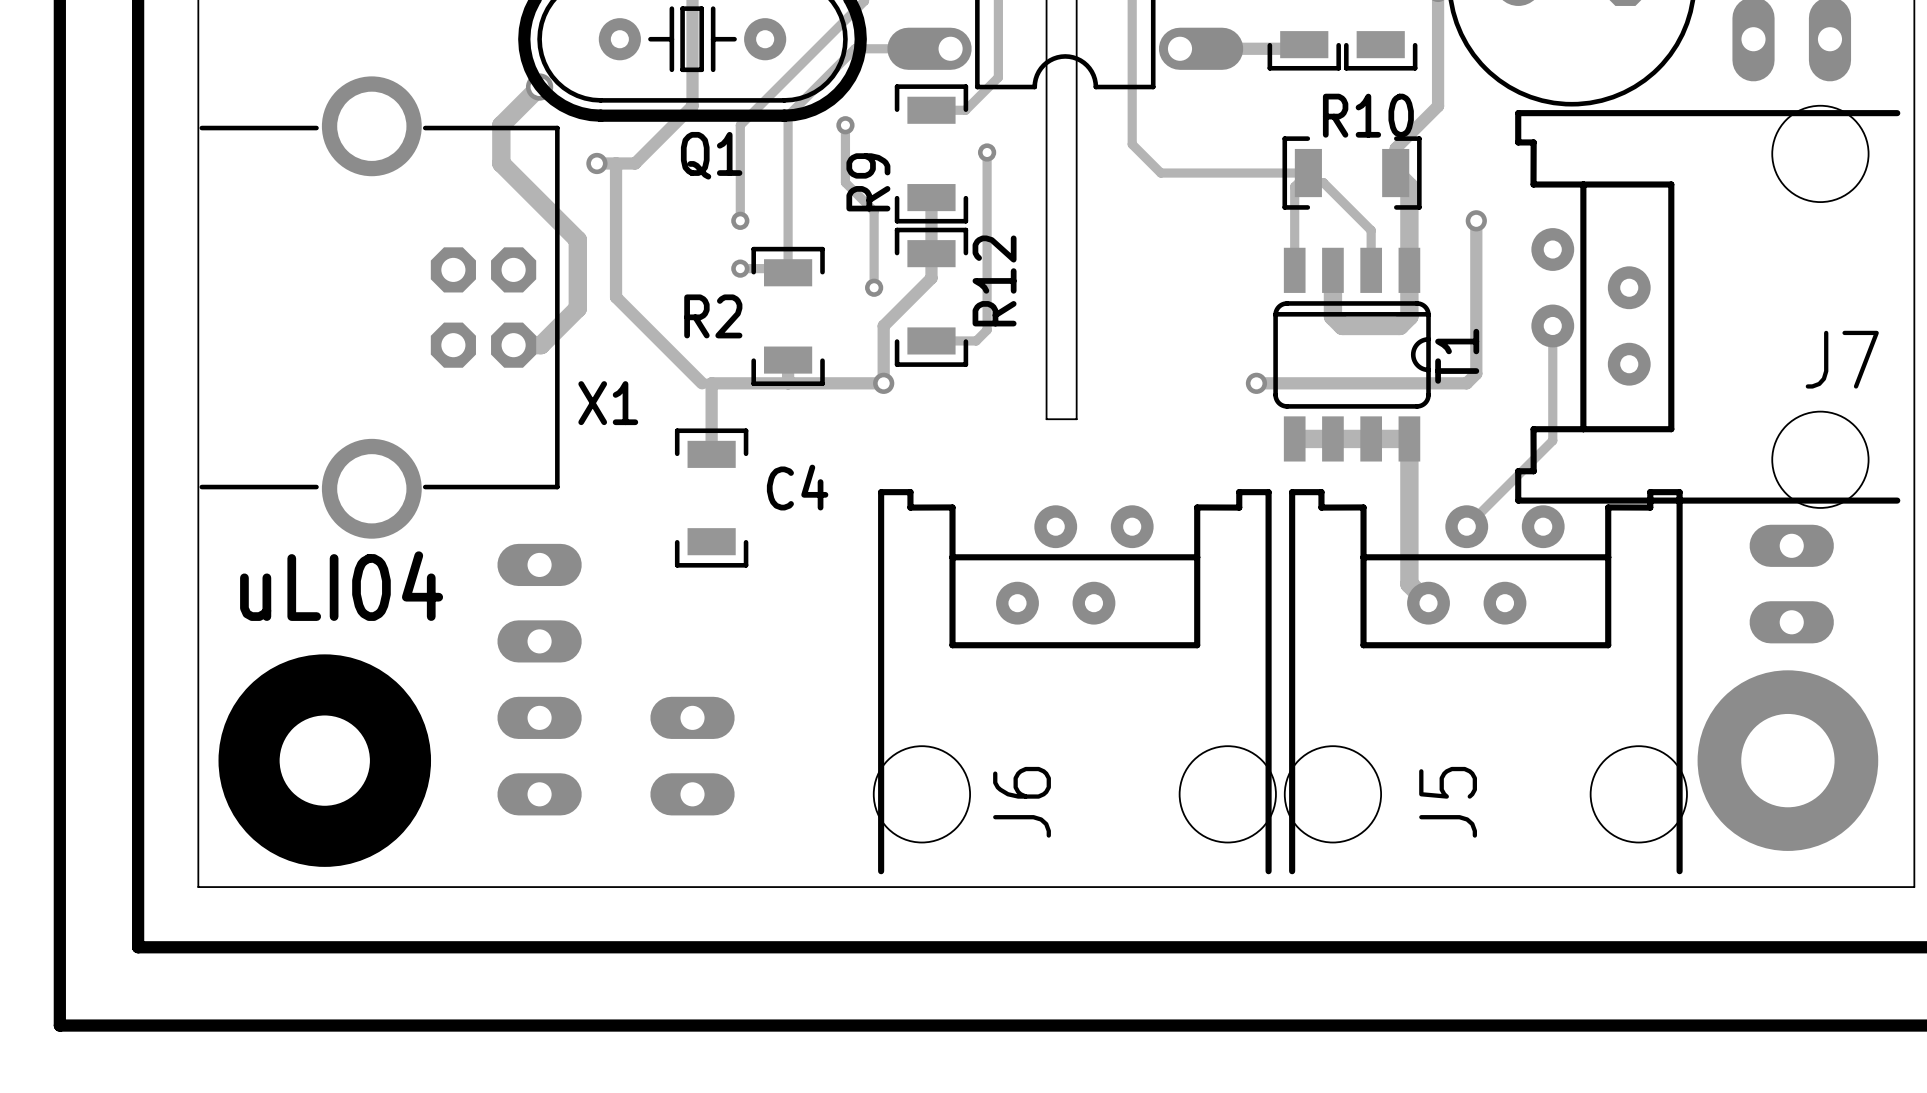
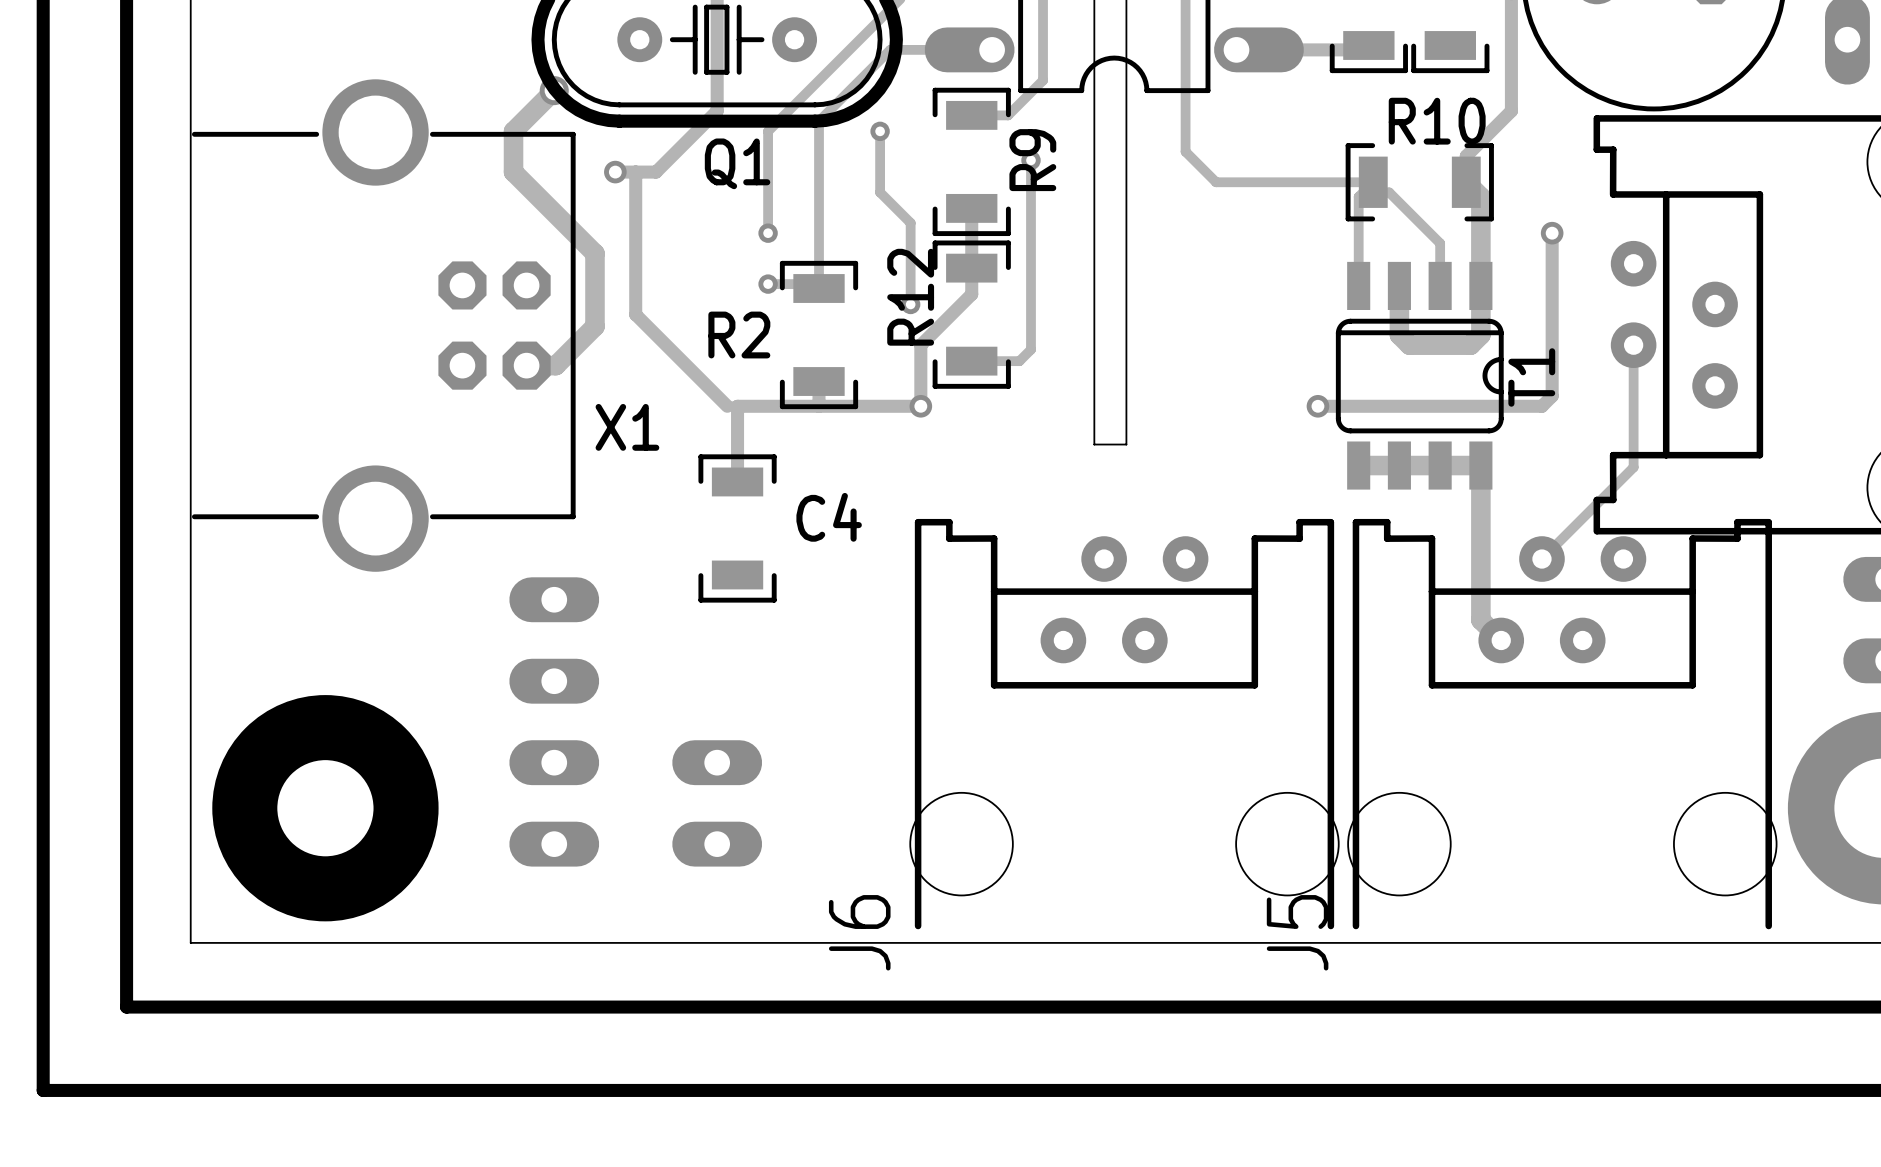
R9 name position: R9 (868, 182) -> R9 (1032, 160)
R12 name position: R12 (994, 280) -> R12 (910, 297)
text: uLI04 (341, 586) -> none
J6 name position: J6 (1022, 802) -> J6 (859, 932)
J5 name position: J5 (1448, 802) -> J5 (1297, 932)

